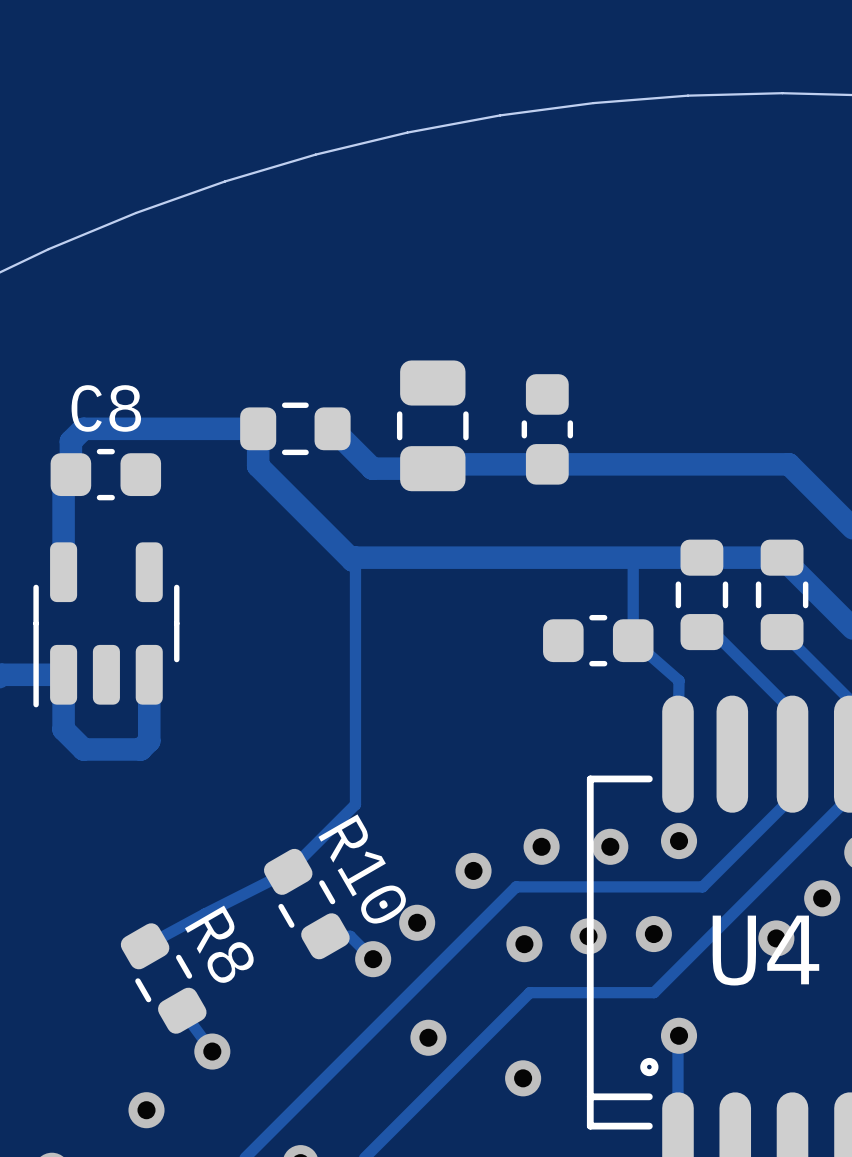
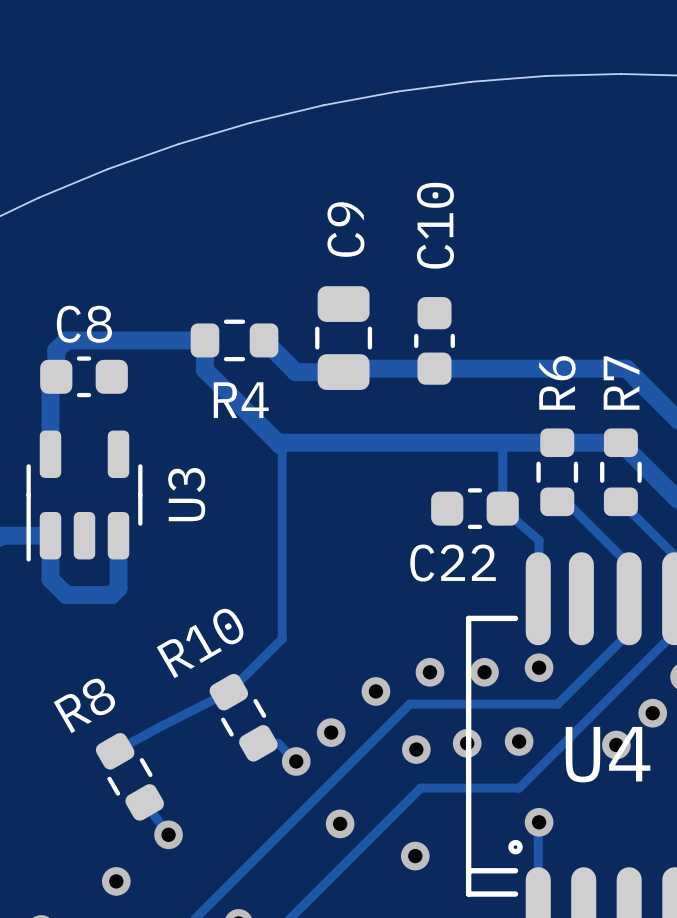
C10 name: none -> C10 (435, 225)
C9 name: none -> C9 (345, 229)
R6 name: none -> R6 (557, 382)
R7 name: none -> R7 (621, 383)
R4 name: none -> R4 (241, 400)
U3 name: none -> U3 (186, 494)
C22 name: none -> C22 (453, 563)
R10 name rotation: 0° (362, 869) -> 90° counterclockwise (200, 643)
R8 name rotation: 0° (219, 944) -> 90° counterclockwise (84, 705)

